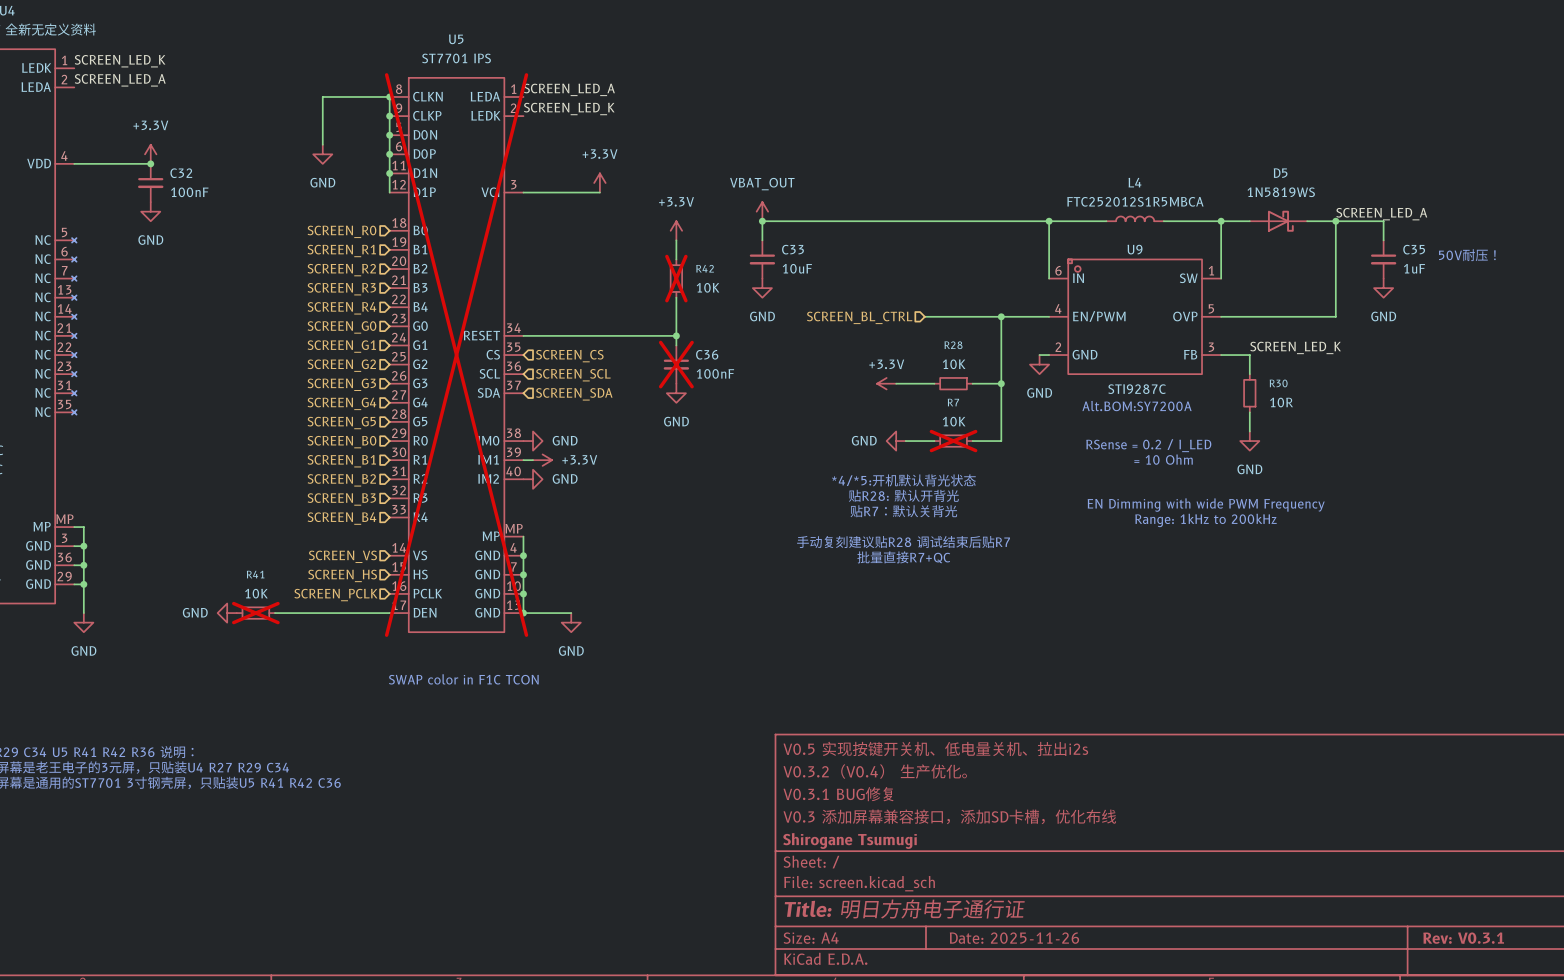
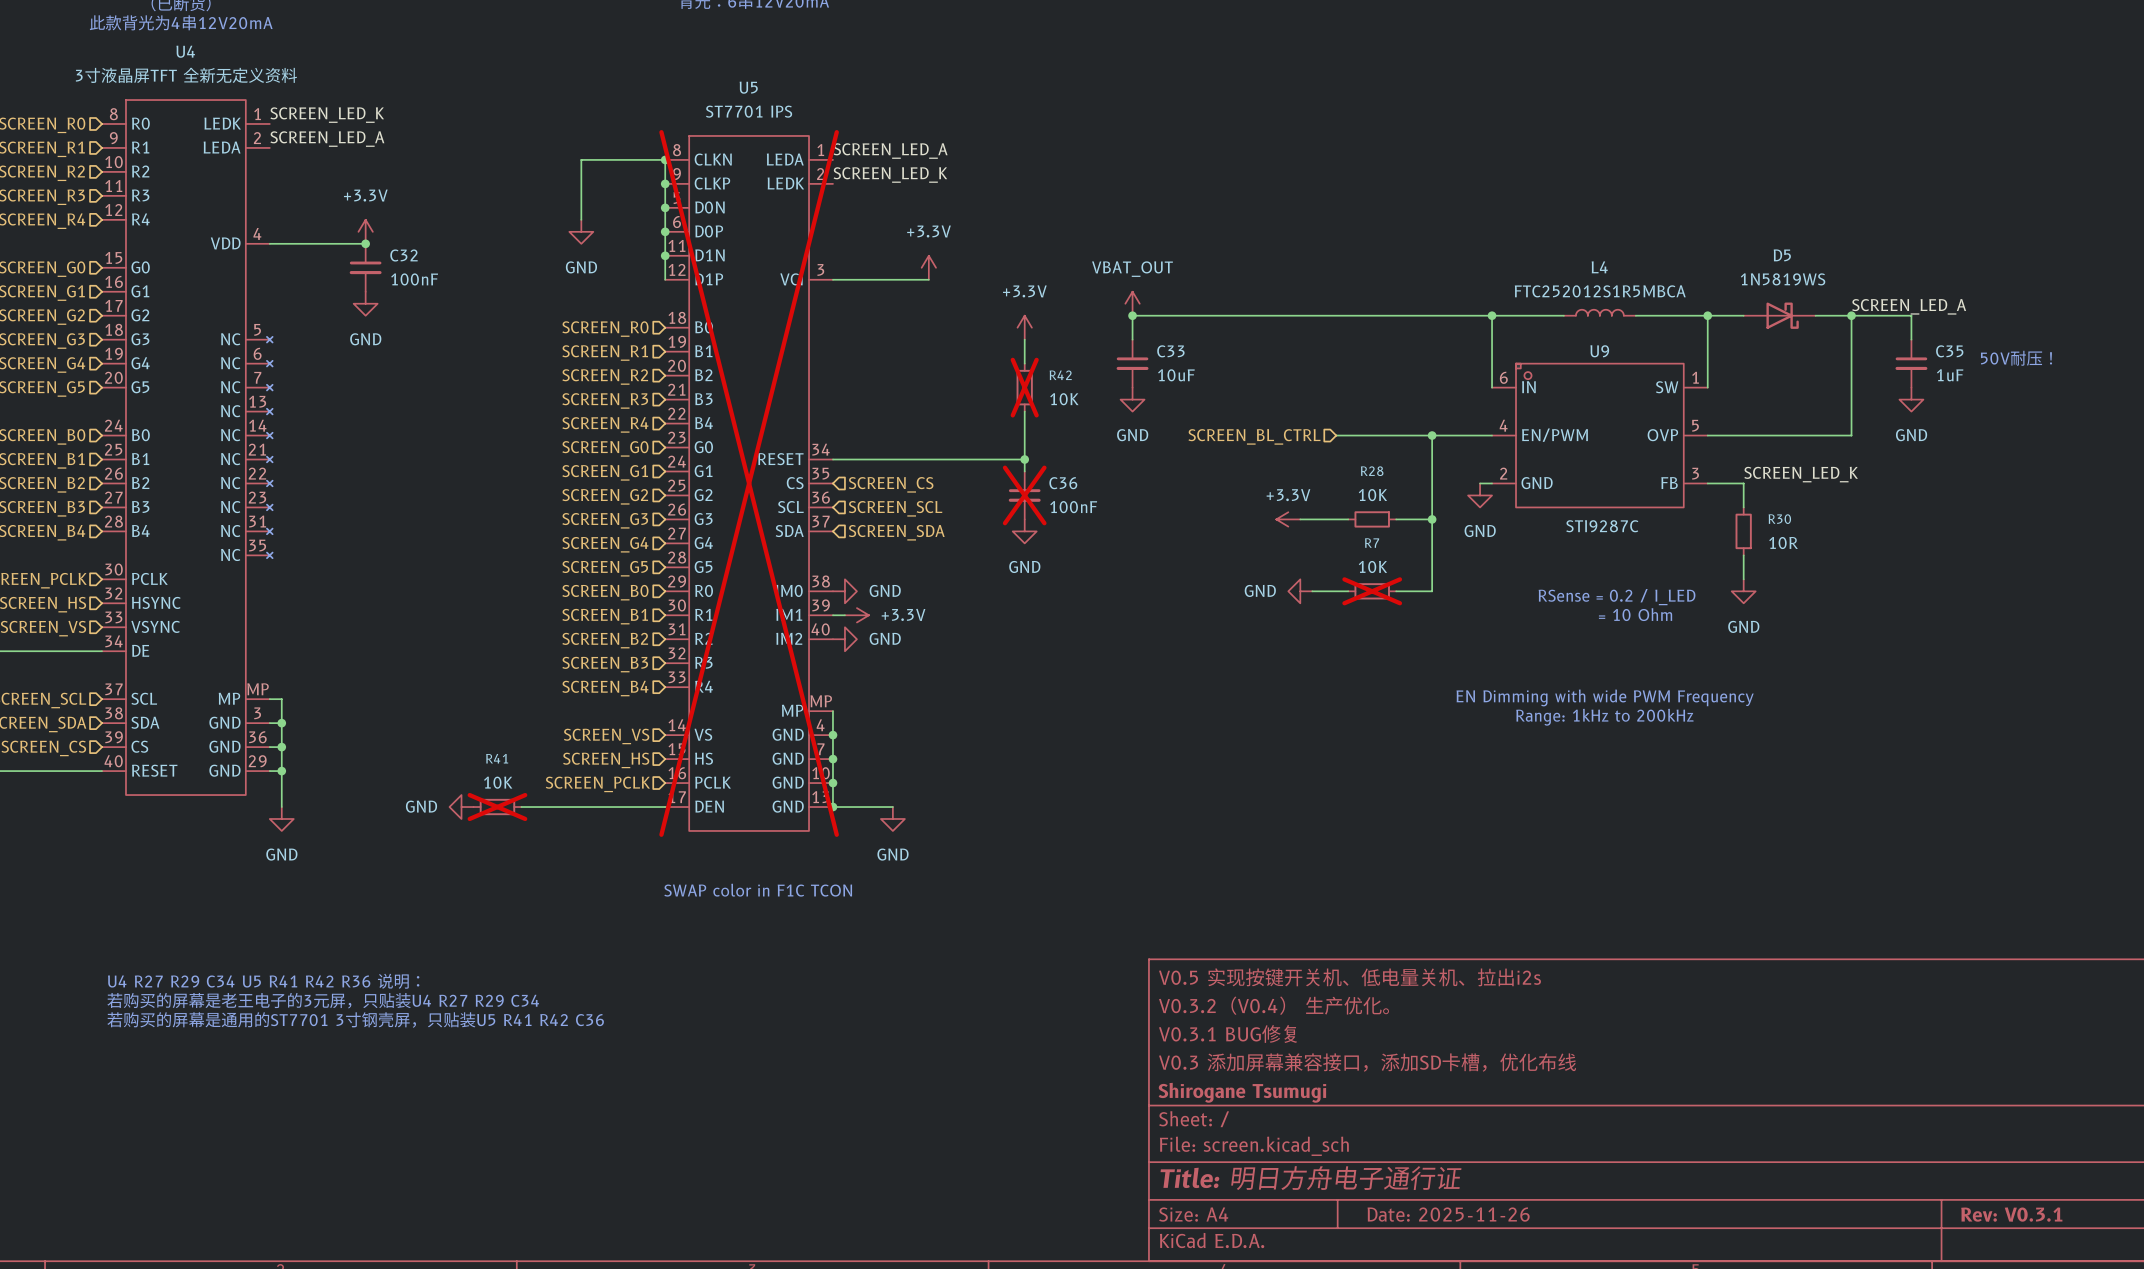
text: Alt.BOM:SY7200A (1137, 406) -> none
text: *4/*5:开机默认背光状态 (903, 480) -> none
text: 贴R28: 默认开背光 (903, 495) -> none
text position: EN Dimming with wide PWM Frequency (1206, 505) -> EN Dimming with wide PWM Frequency (1605, 697)
text: 贴R7：默认关背光 (903, 511) -> none
text position: Range: 1kHz to 200kHz (1206, 520) -> Range: 1kHz to 200kHz (1604, 717)
text: 手动复刻建议贴R28 调试结束后贴R7 (903, 542) -> none
text: 批量直接R7+QC (903, 557) -> none

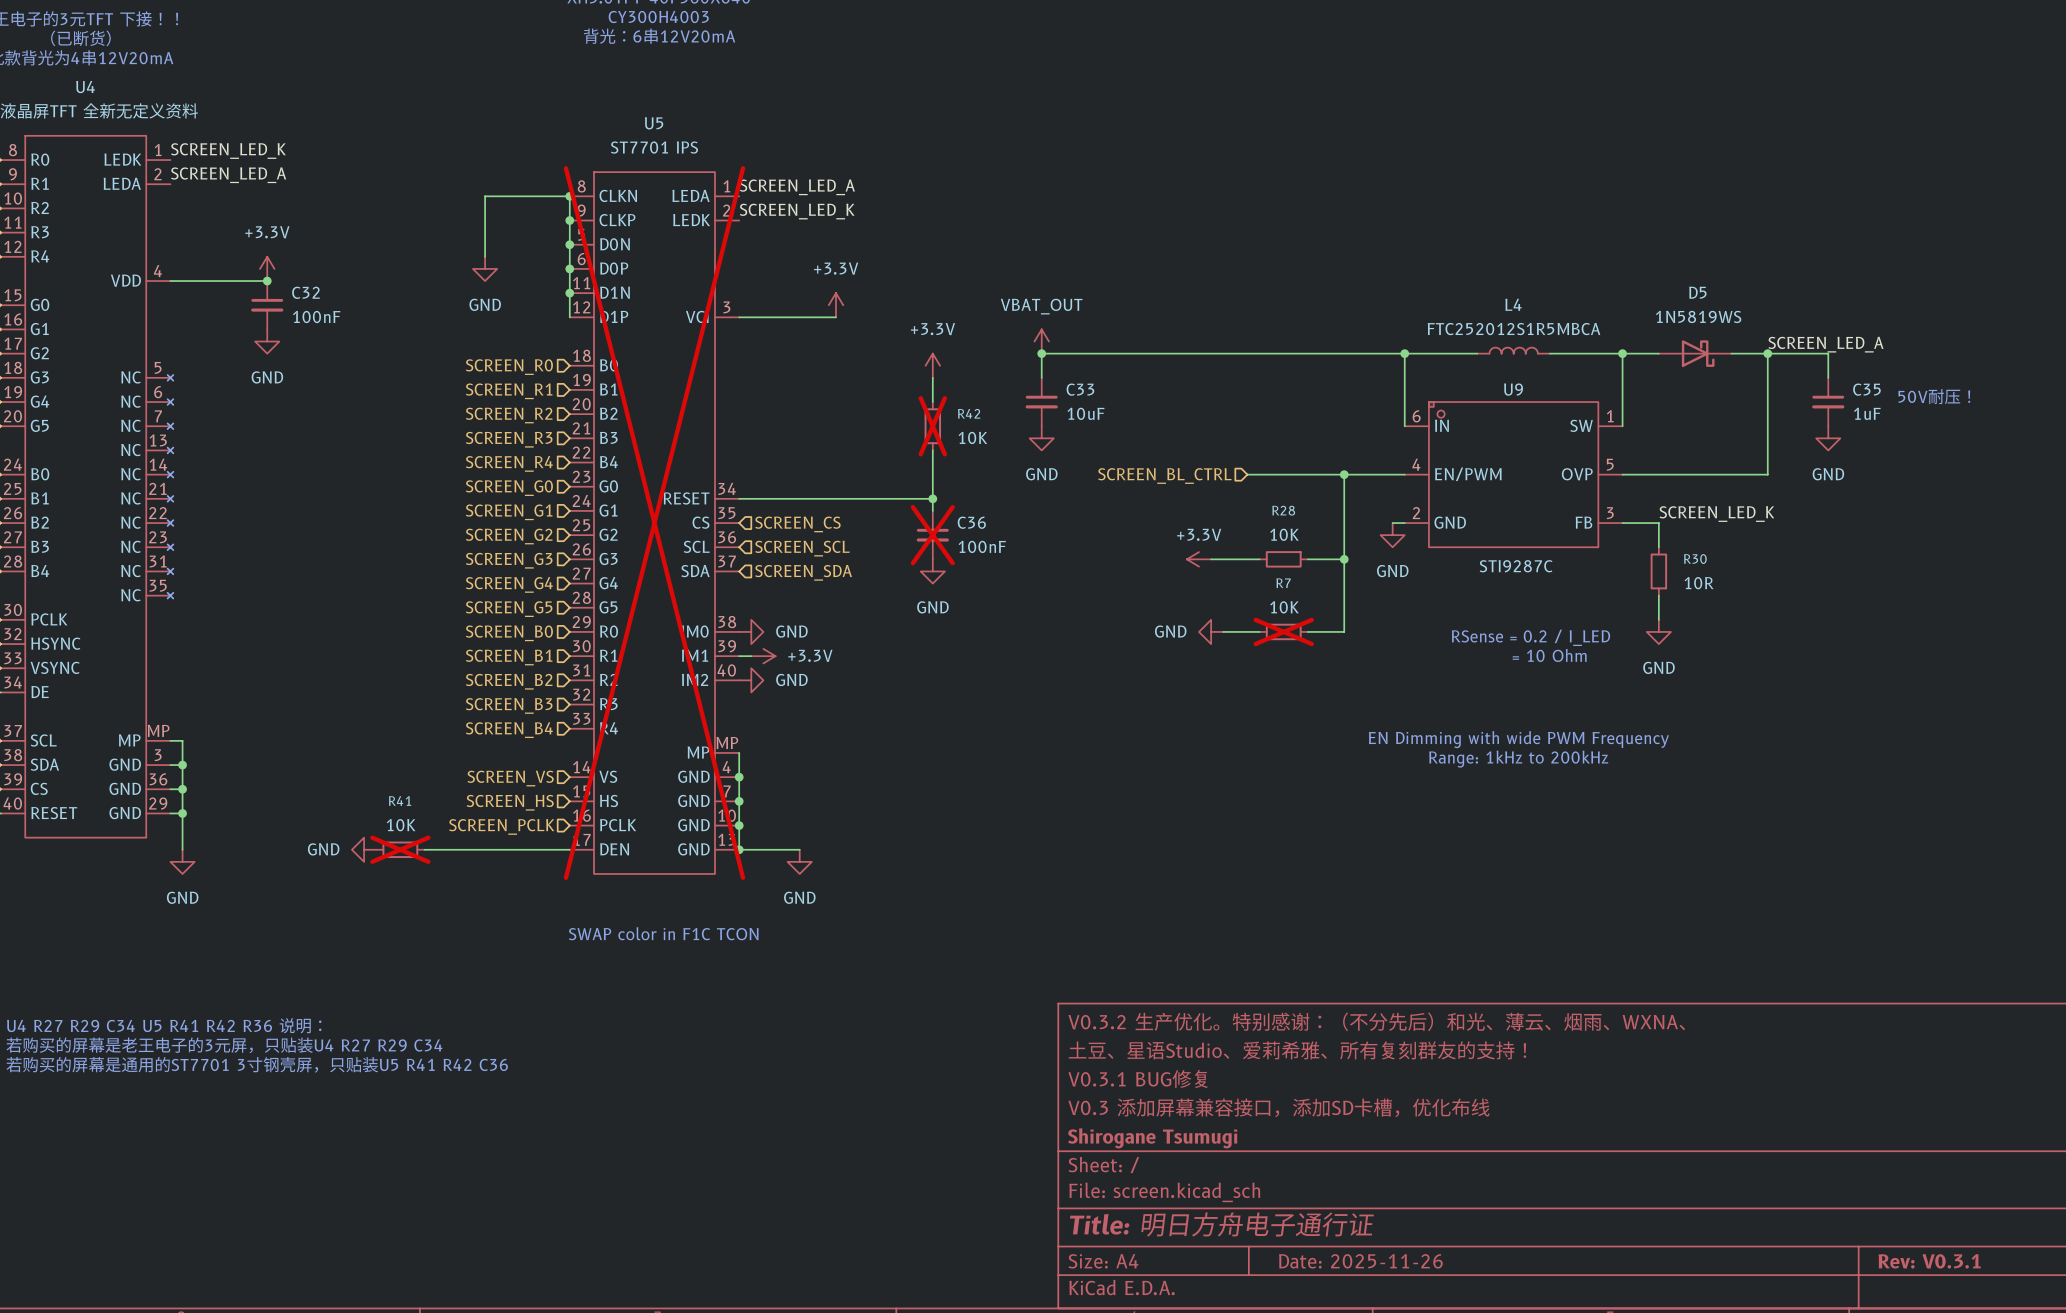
title block: V0.5 实现按键开关机、低电量关机、拉出i2s (1349, 977) -> V0.3.2 生产优化。特别感谢：（不分先后）和光、薄云、烟雨、WXNA、 (1376, 1021)
title block: V0.3.2（V0.4） 生产优化。 (1274, 1005) -> 土豆、星语Studio、爱莉希雅、所有复刻群友的支持！ (1297, 1050)

